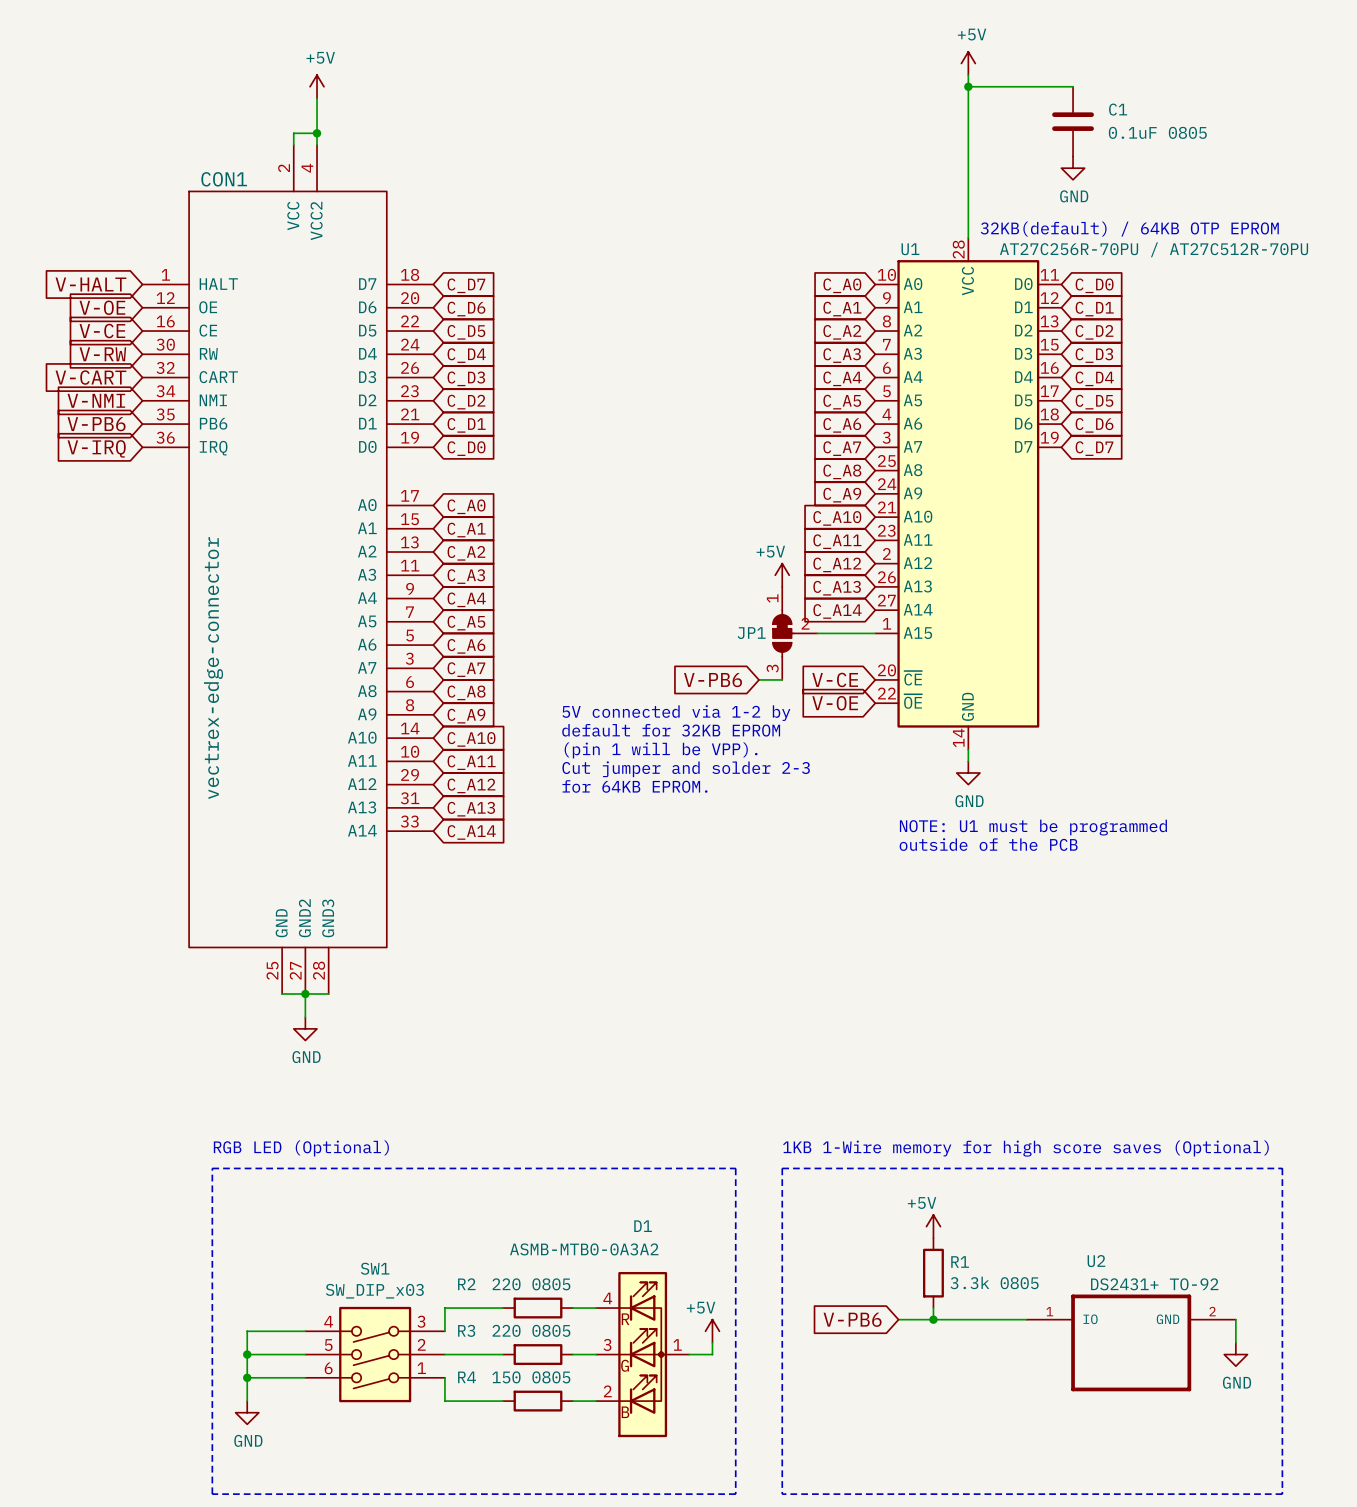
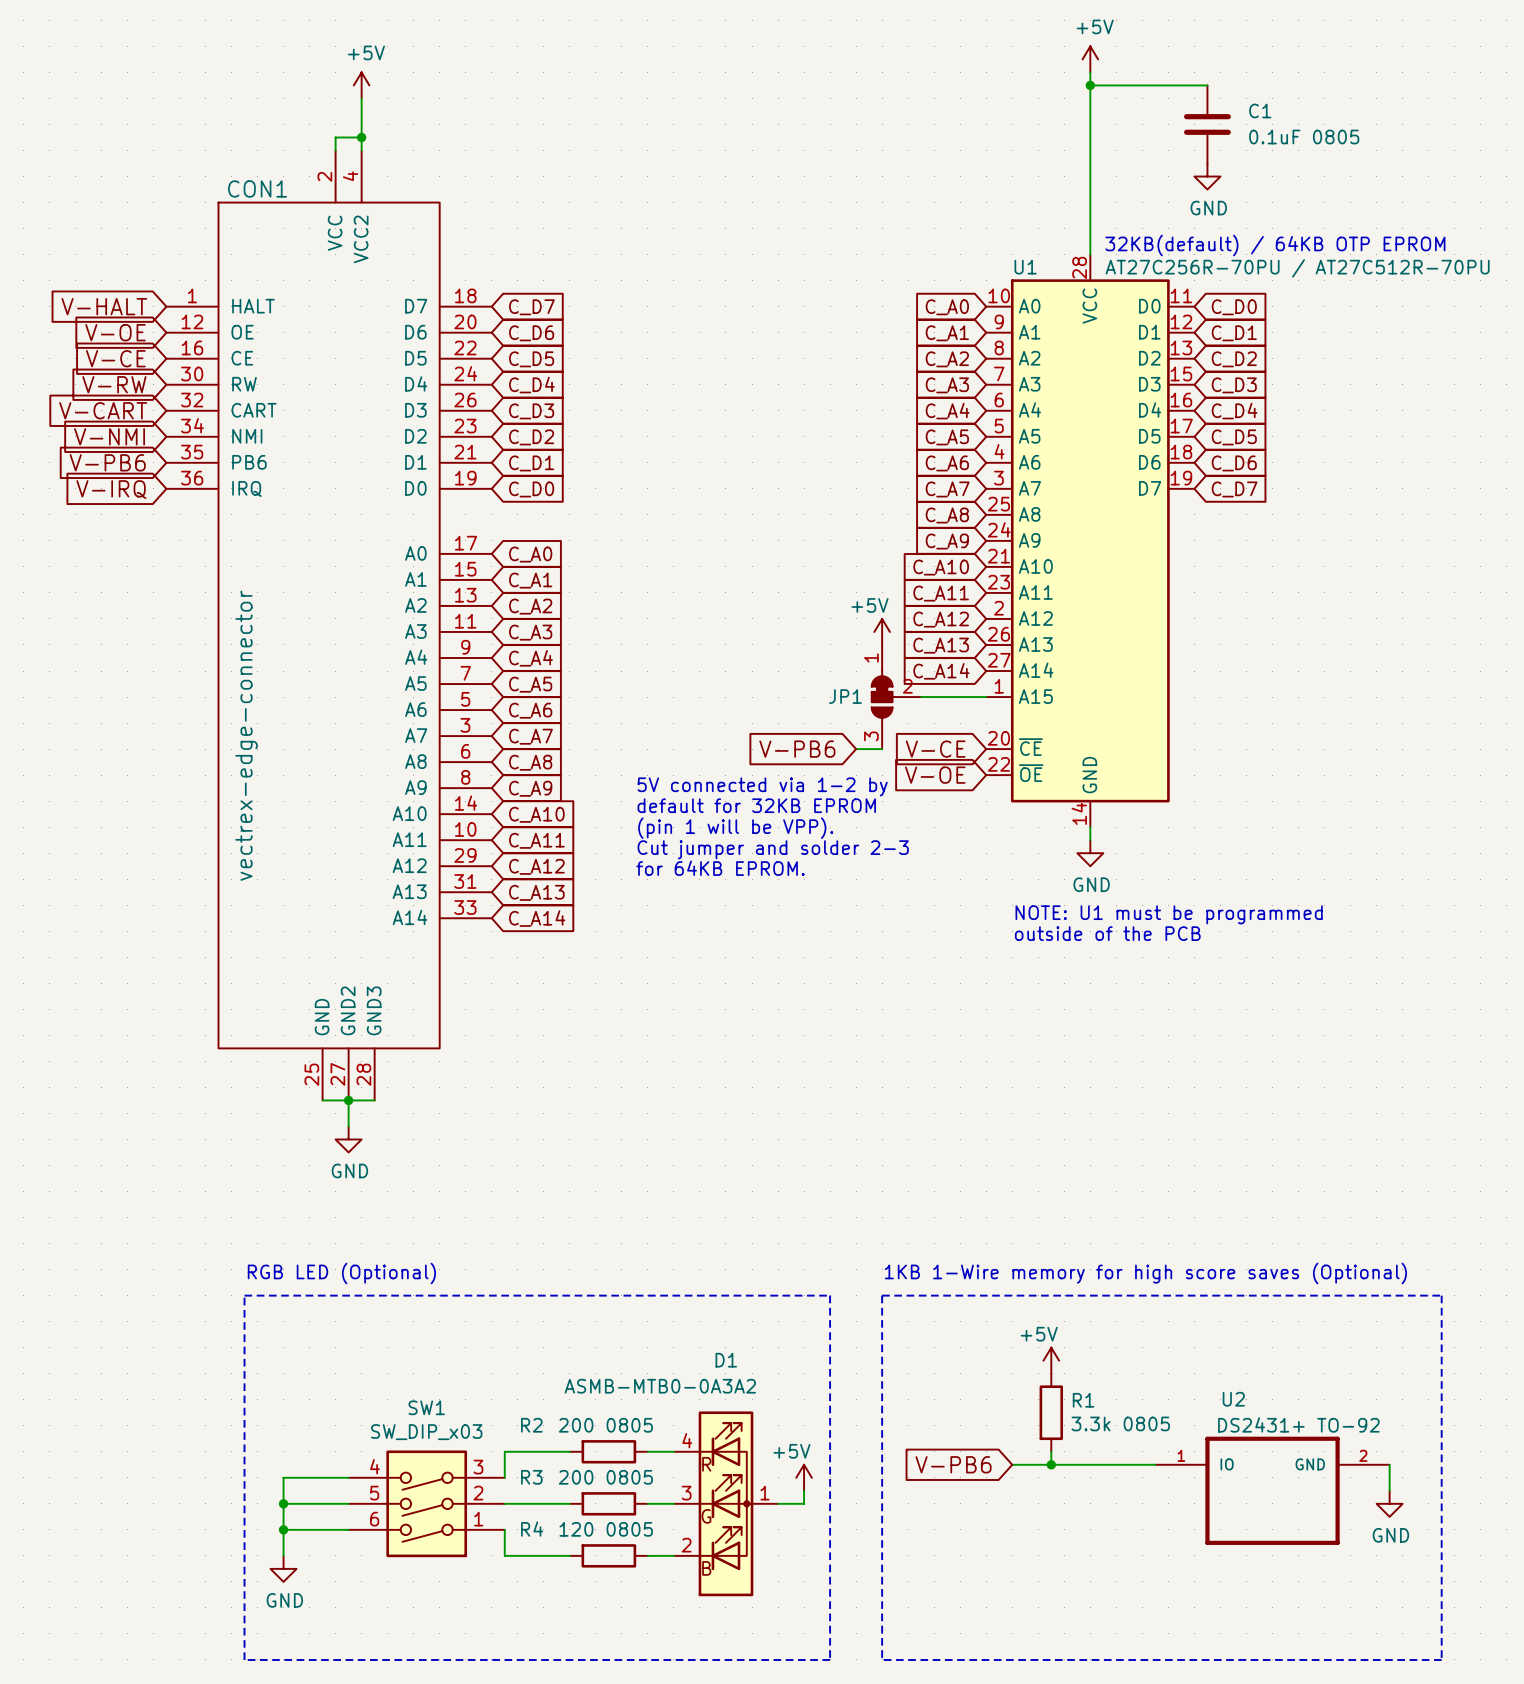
R2 value: 220 0805 (531, 1284) -> 200 0805 (605, 1425)
R3 value: 220 0805 (531, 1330) -> 200 0805 (605, 1477)
R4 value: 150 0805 (531, 1377) -> 120 0805 (606, 1529)

